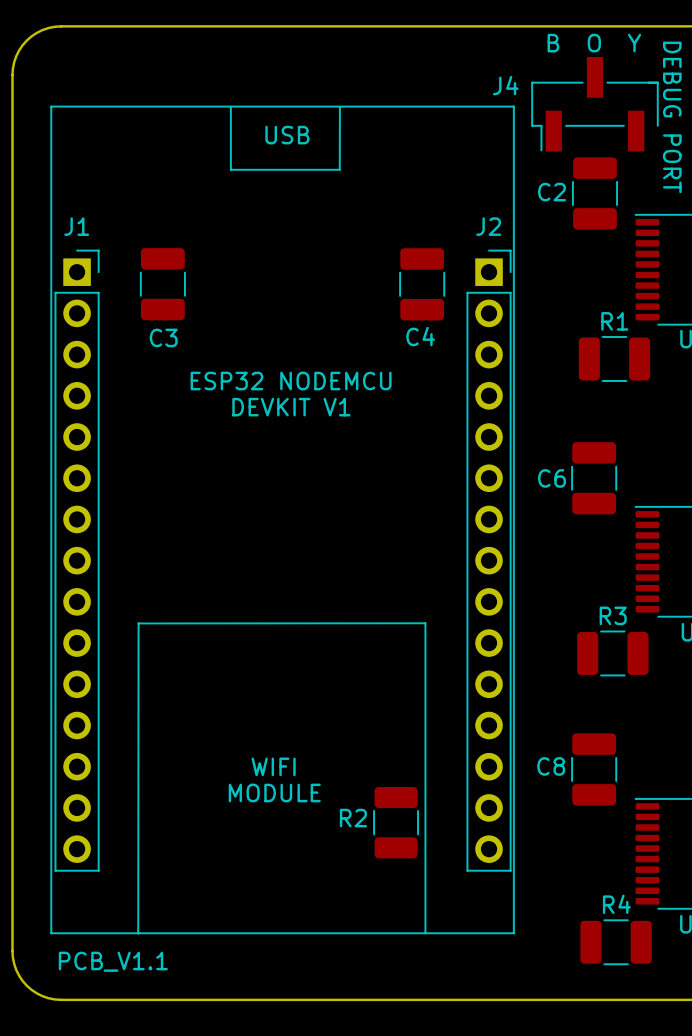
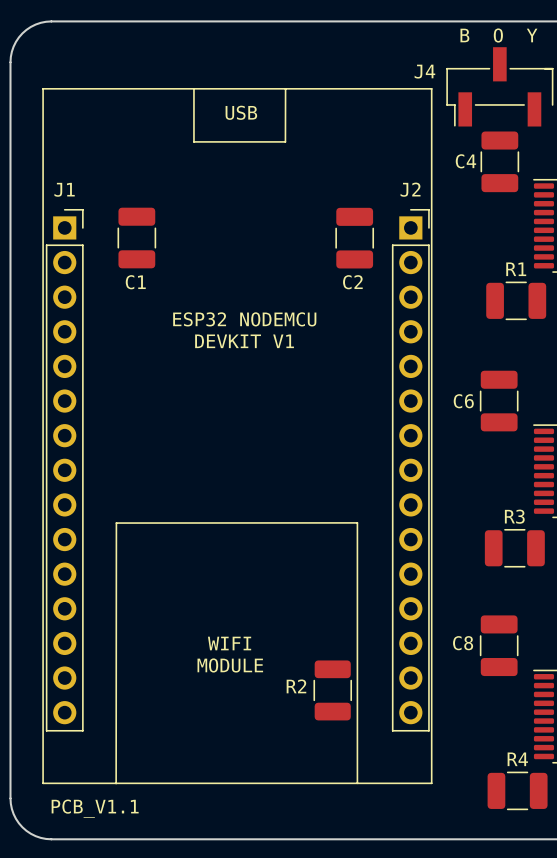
C2 name: C2 (551, 192) -> C4 (465, 161)
C4 name: C4 (420, 336) -> C2 (352, 282)
C3 name: C3 (163, 337) -> C1 (135, 282)

